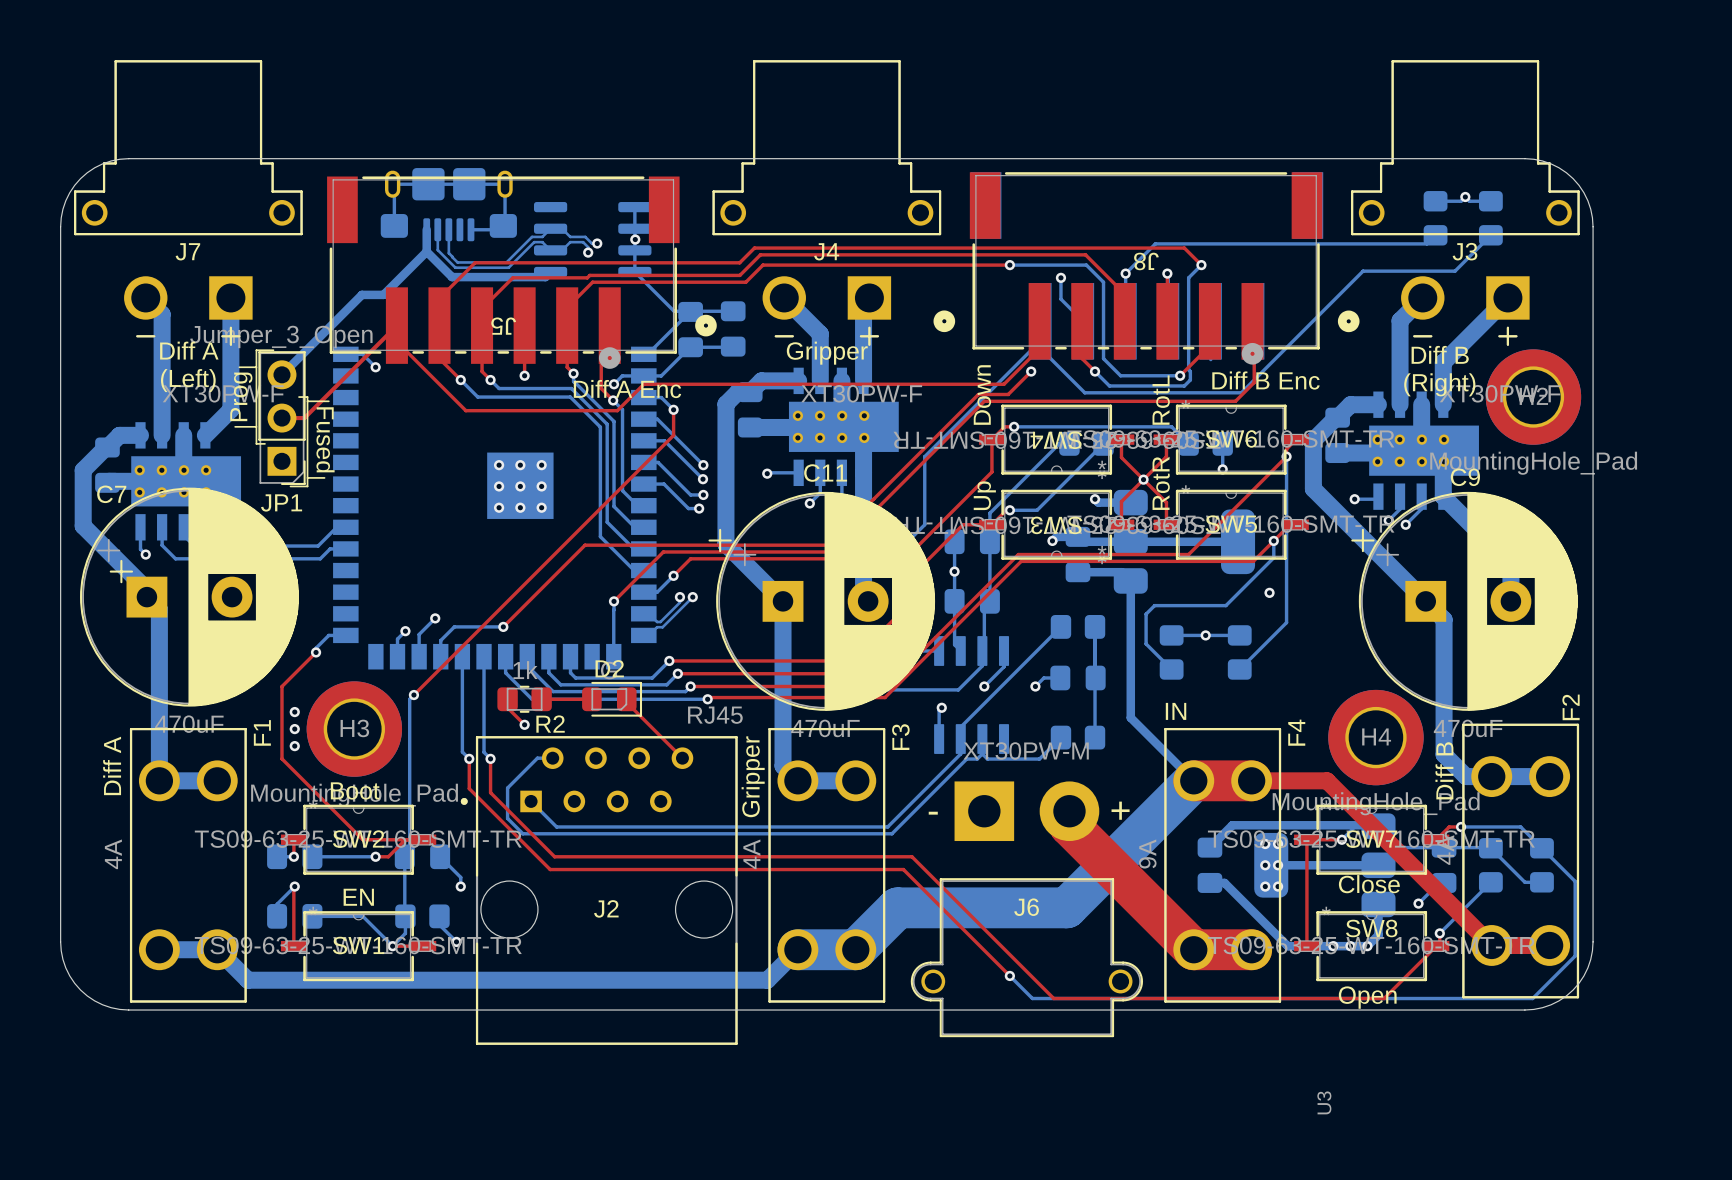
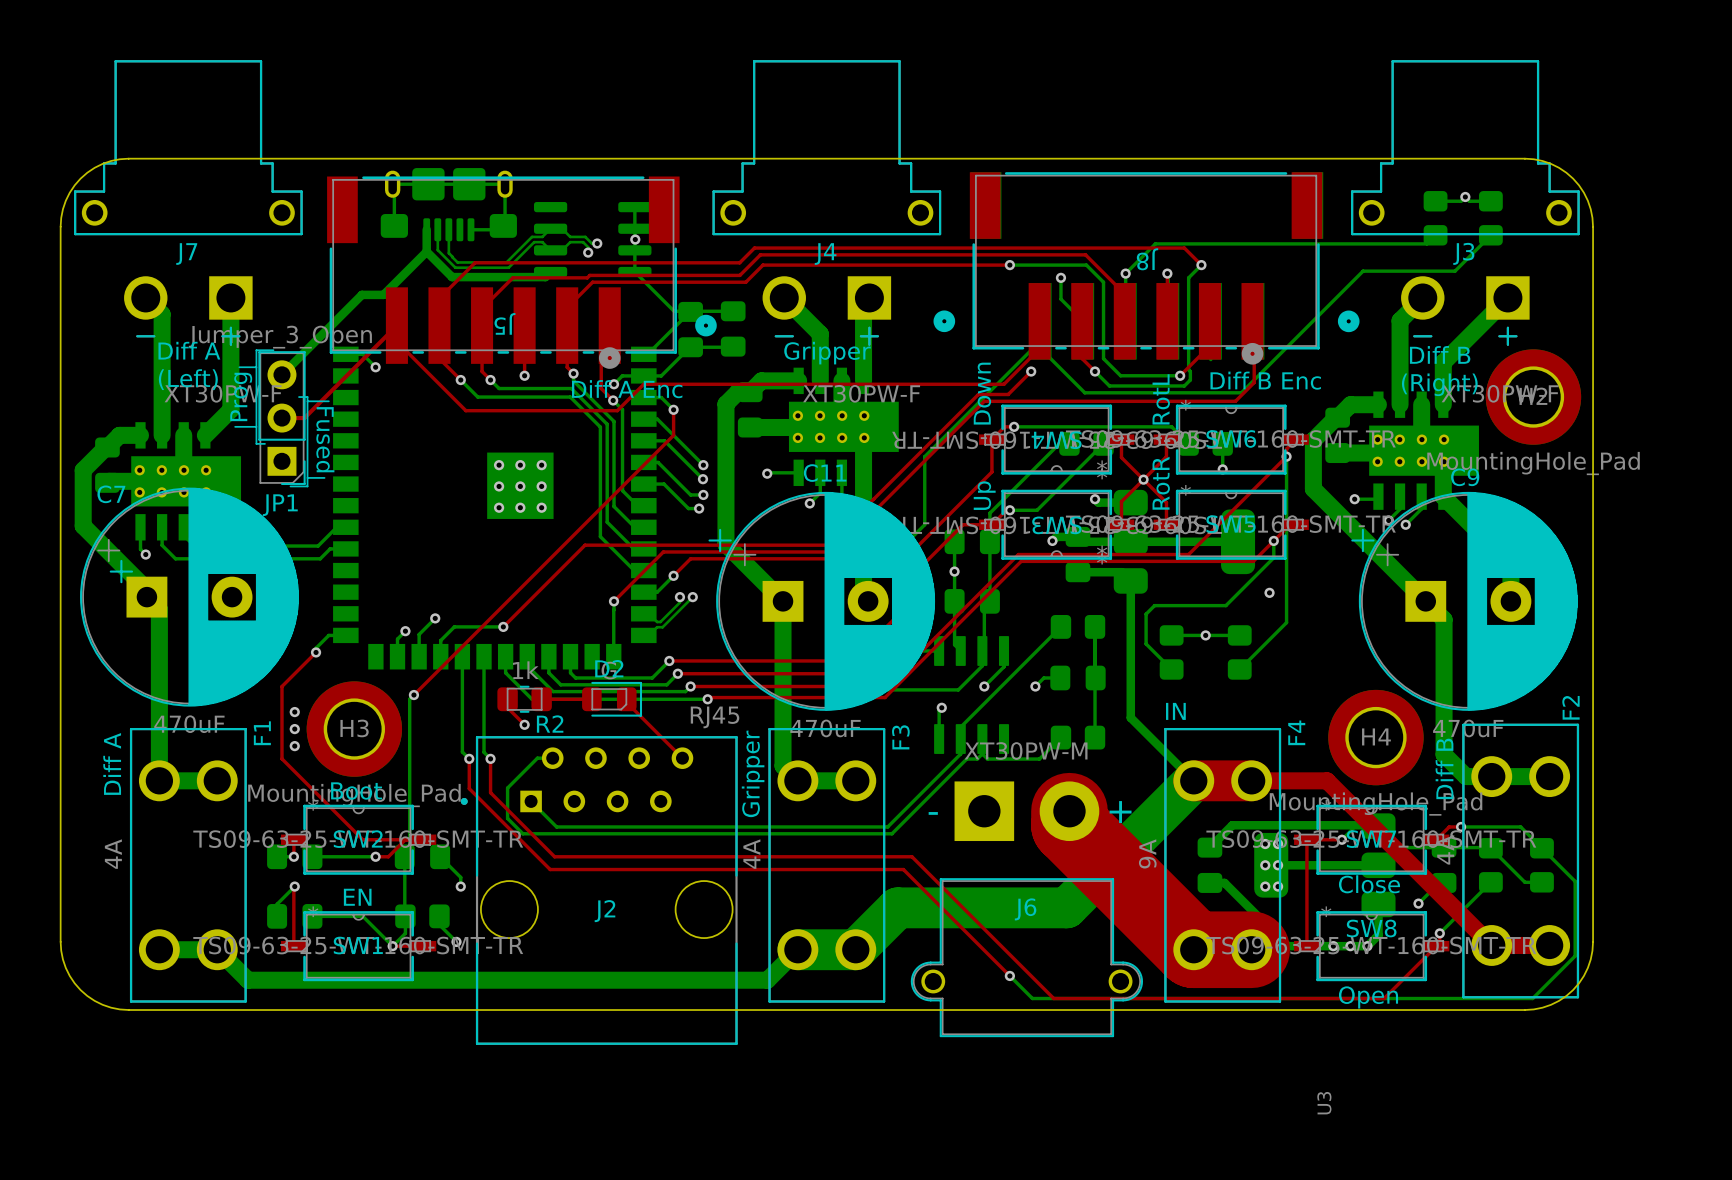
top track width: thin (1069, 811) (1069, 825) (1193, 949) (1251, 949) -> thick (1069, 811) (1069, 825) (1193, 949) (1251, 949)

